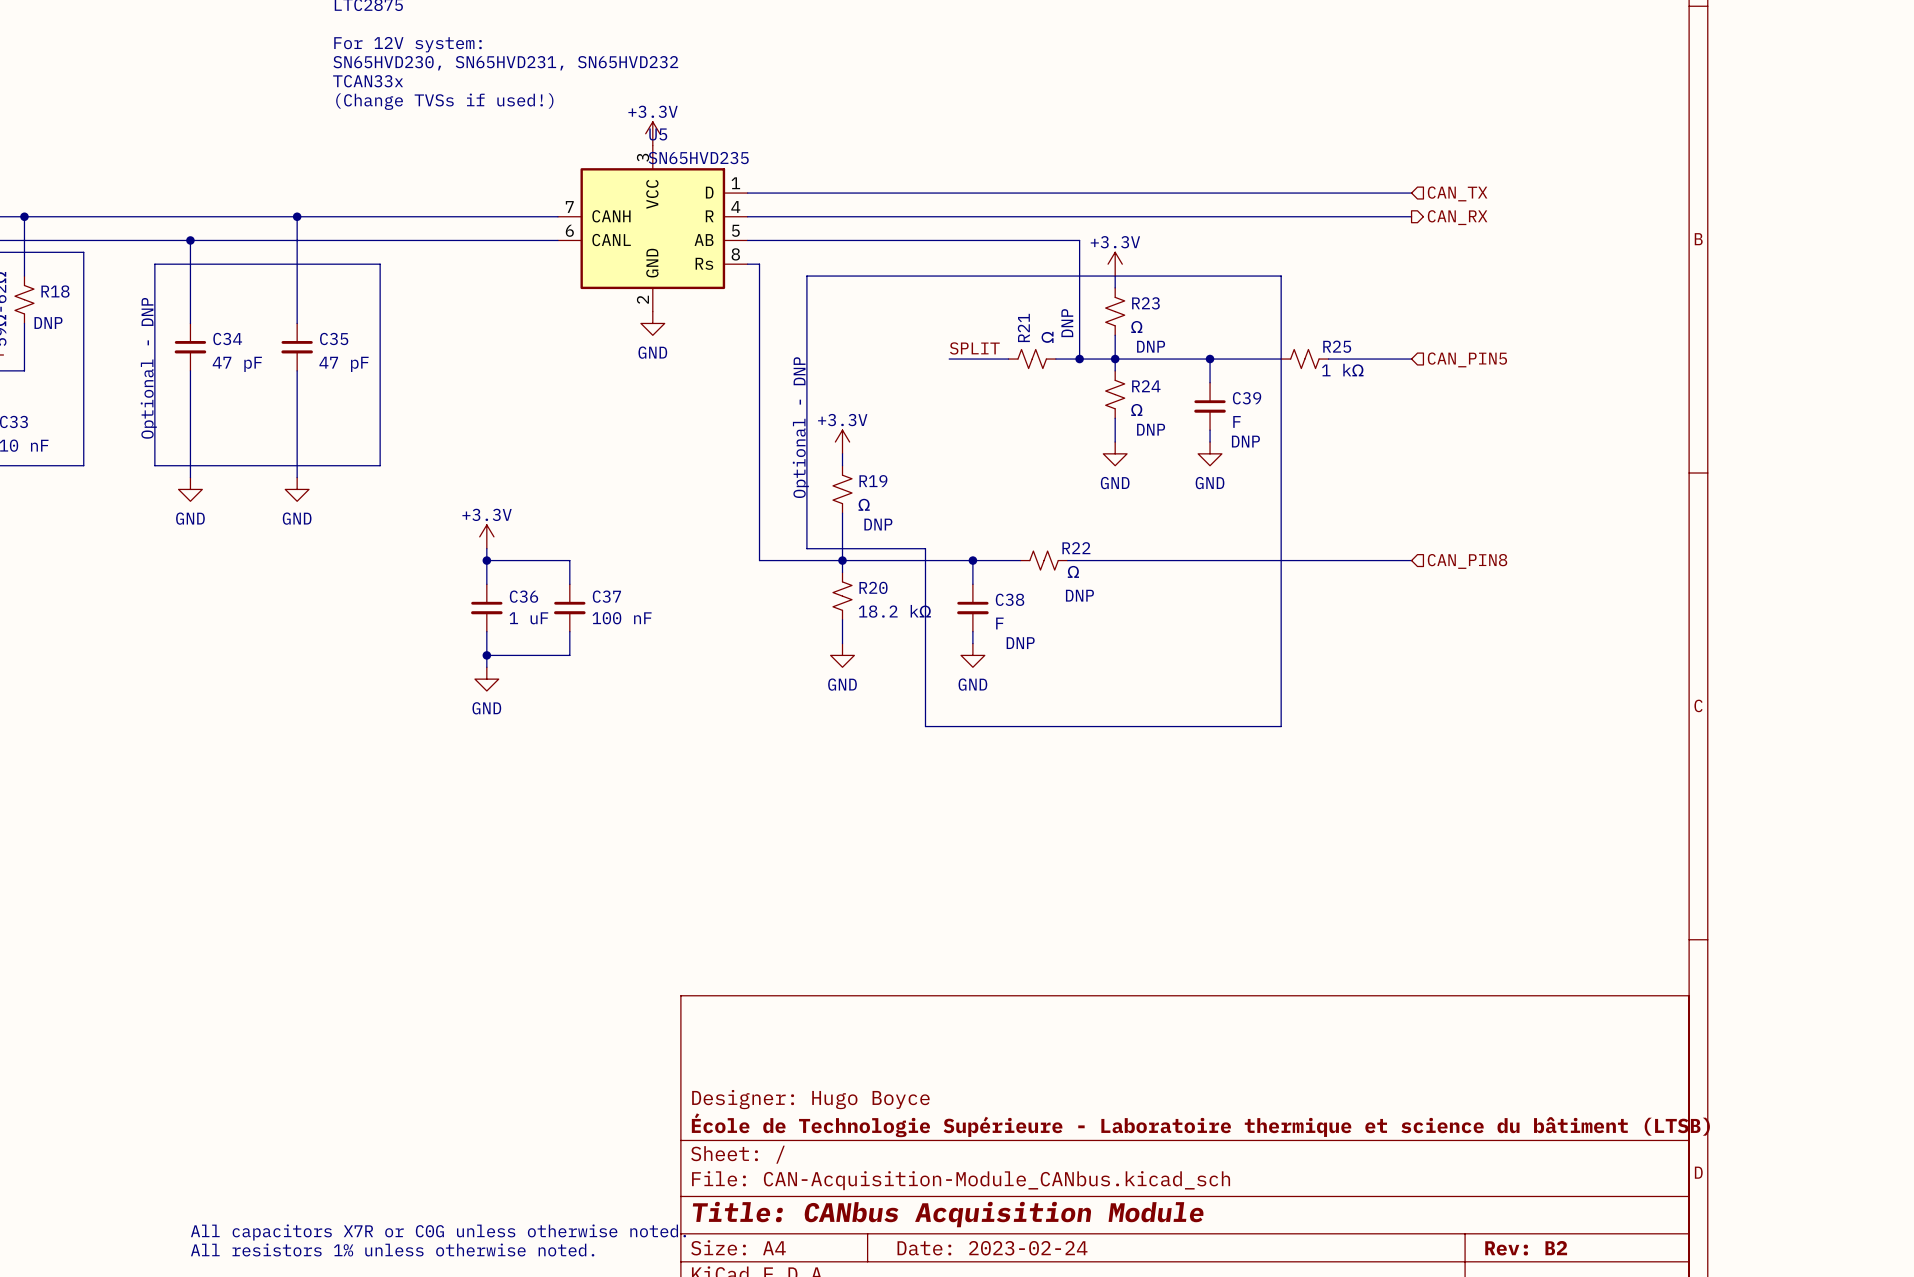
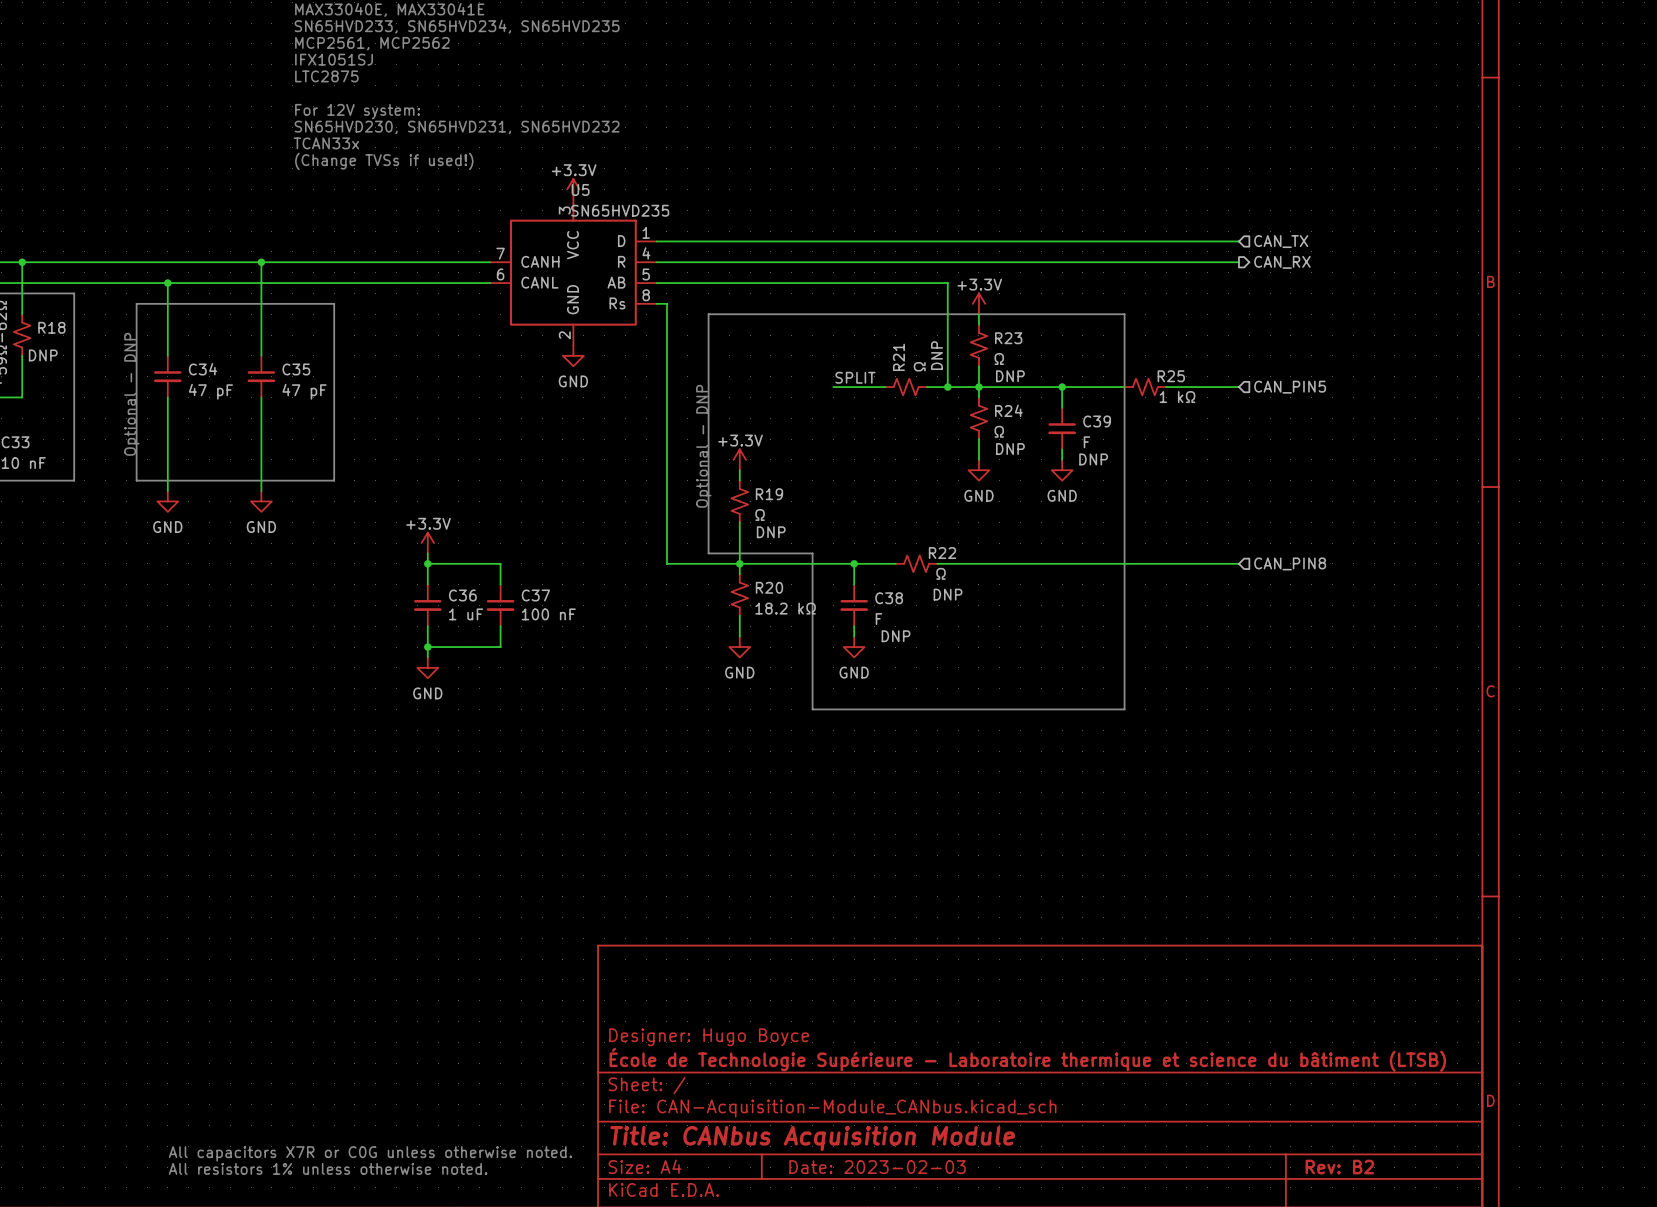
title block: Date: 2023-02-24 (992, 1248) -> Date: 2023-02-03 (877, 1167)

